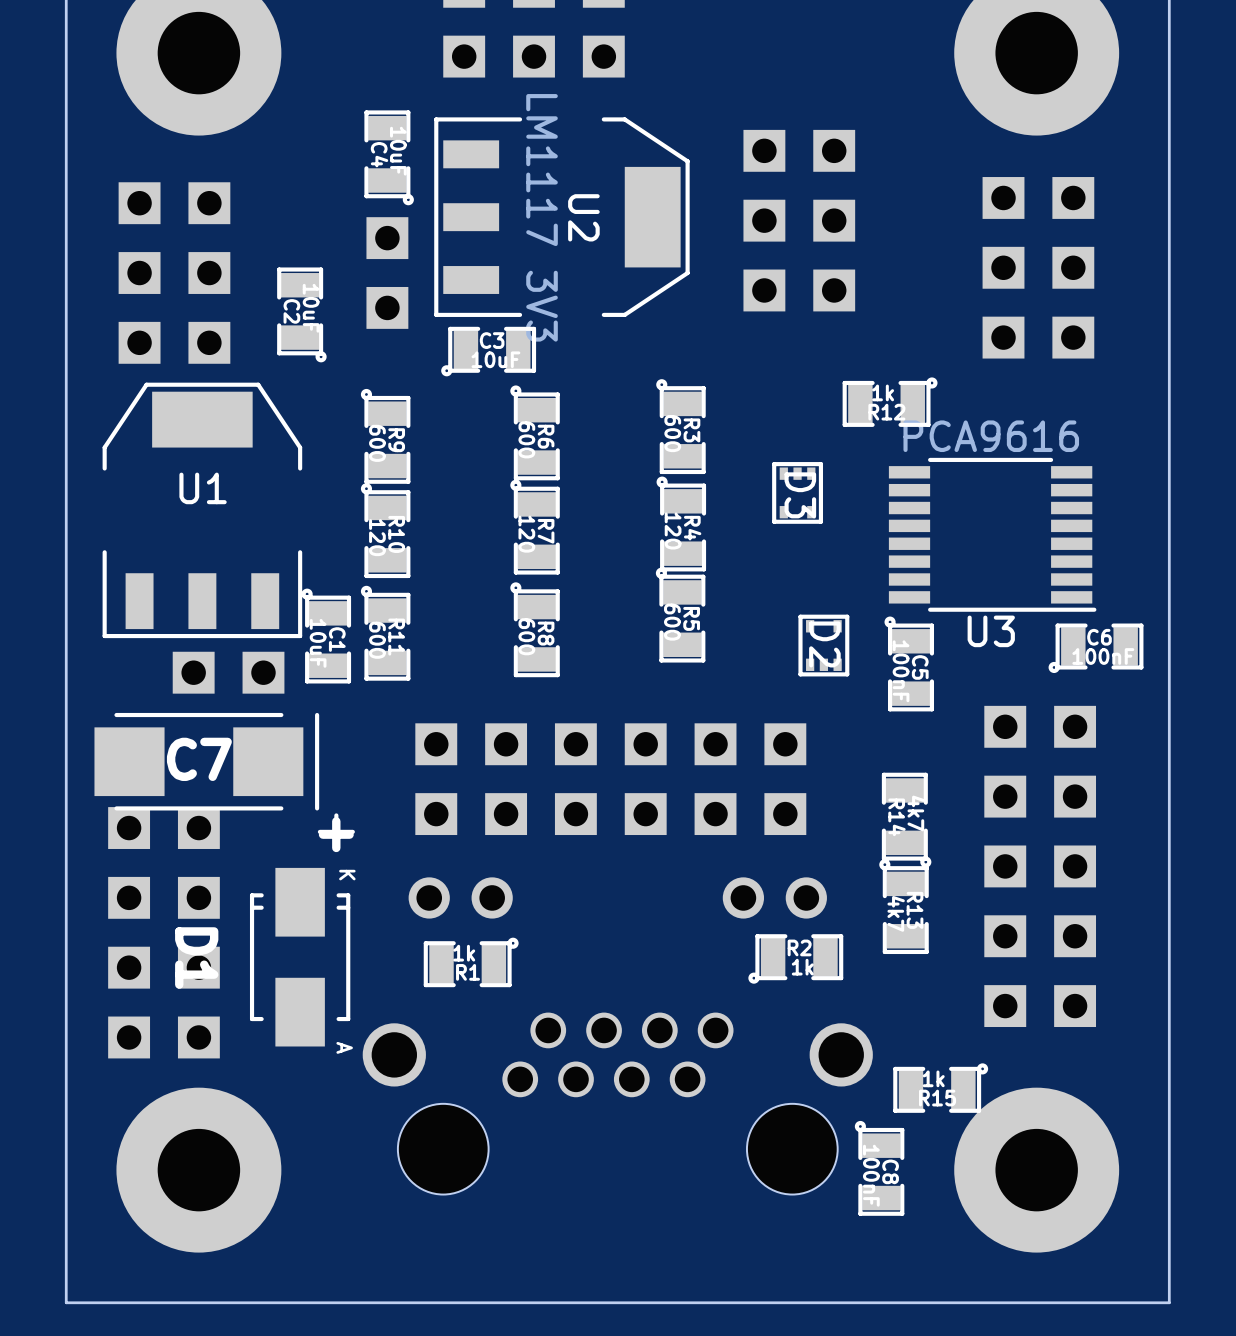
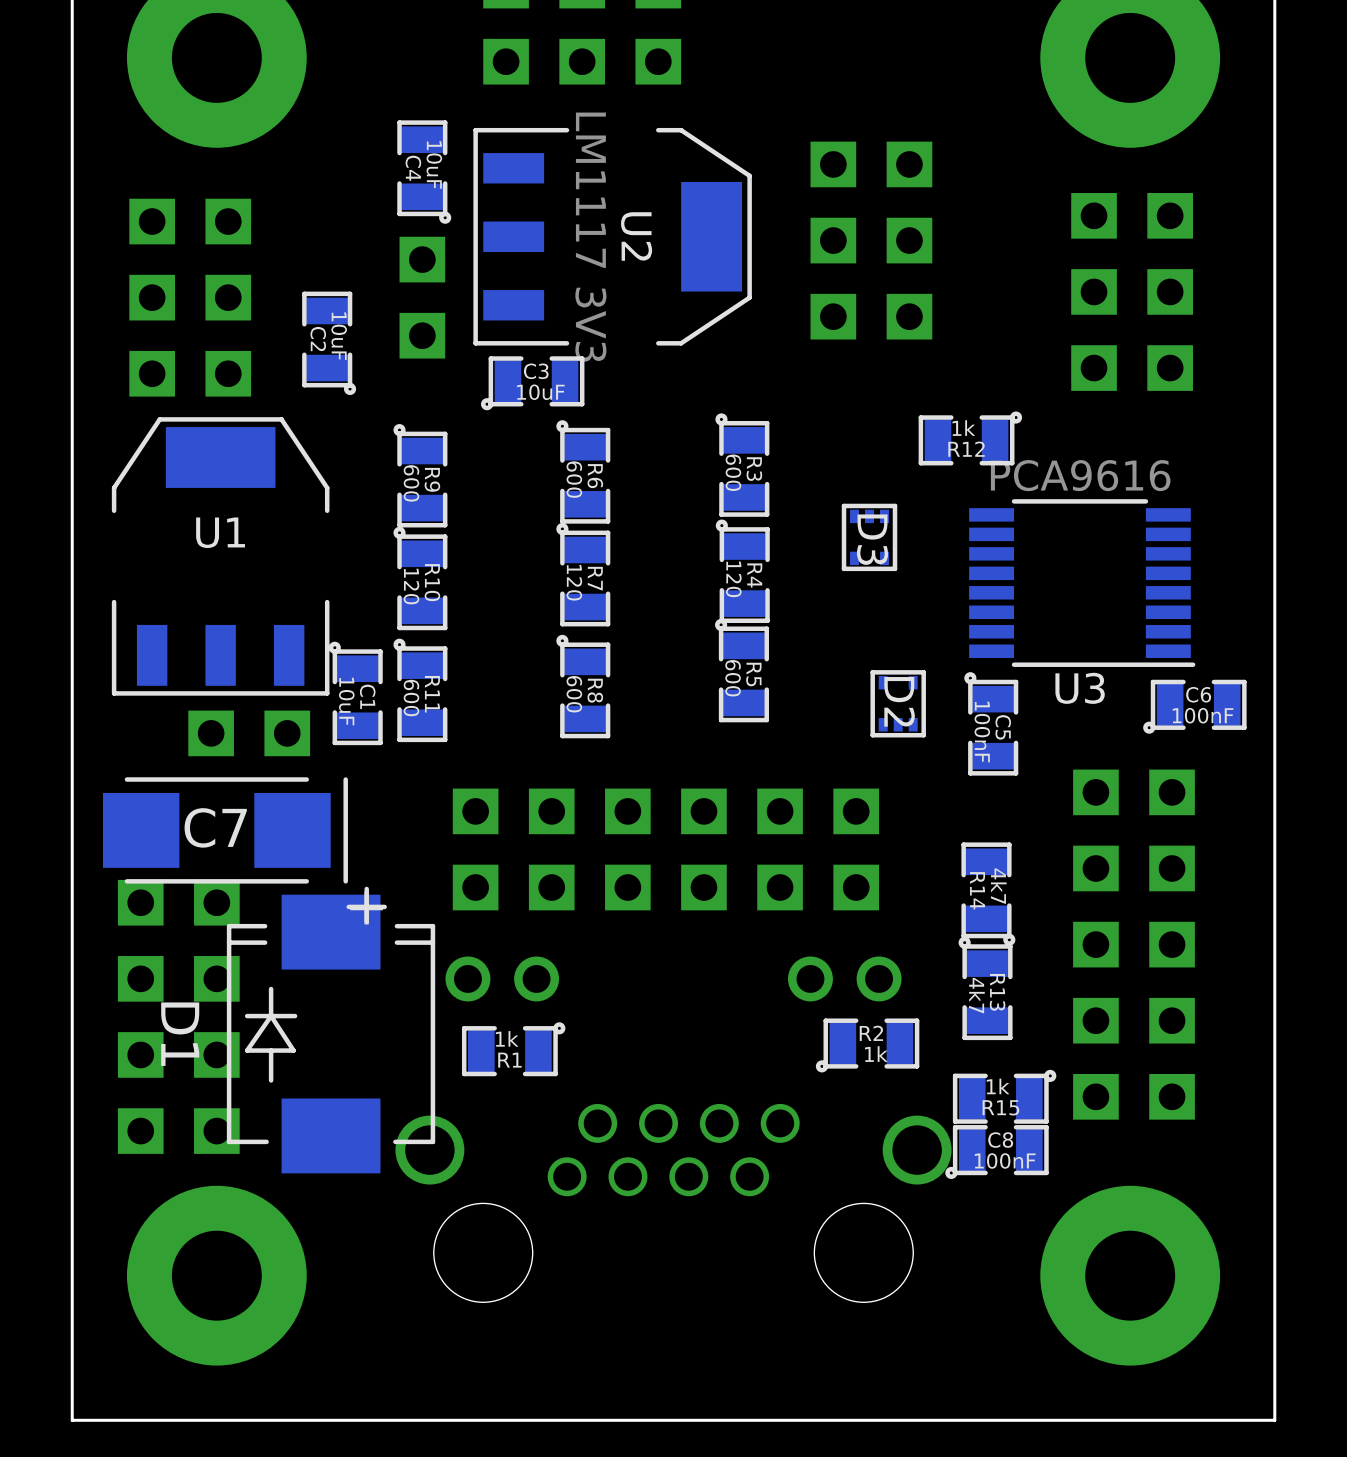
D1 footprint: [249, 867, 351, 1047] -> [226, 894, 436, 1174]
R15 position: (940, 1088) -> (1004, 1096)
C8 rotation: 0° (879, 1168) -> 90° counterclockwise (996, 1152)
C8 position: (879, 1168) -> (996, 1152)

